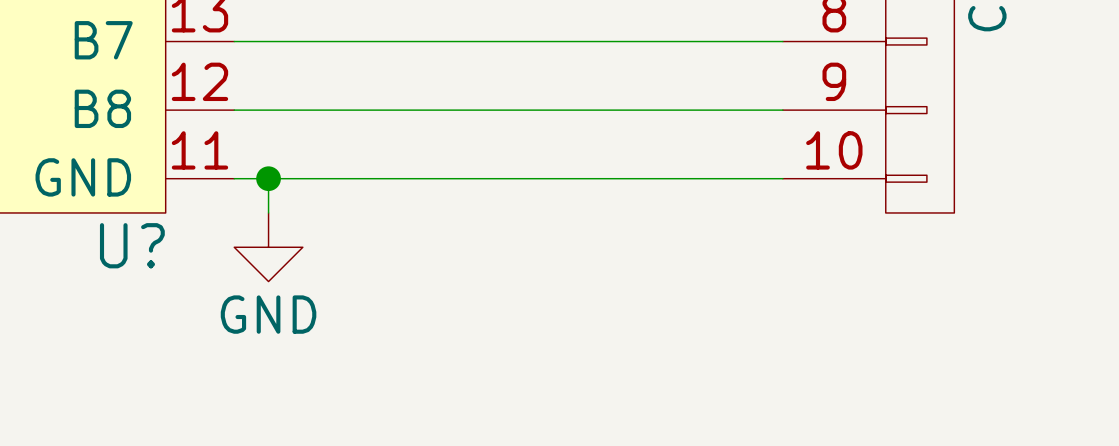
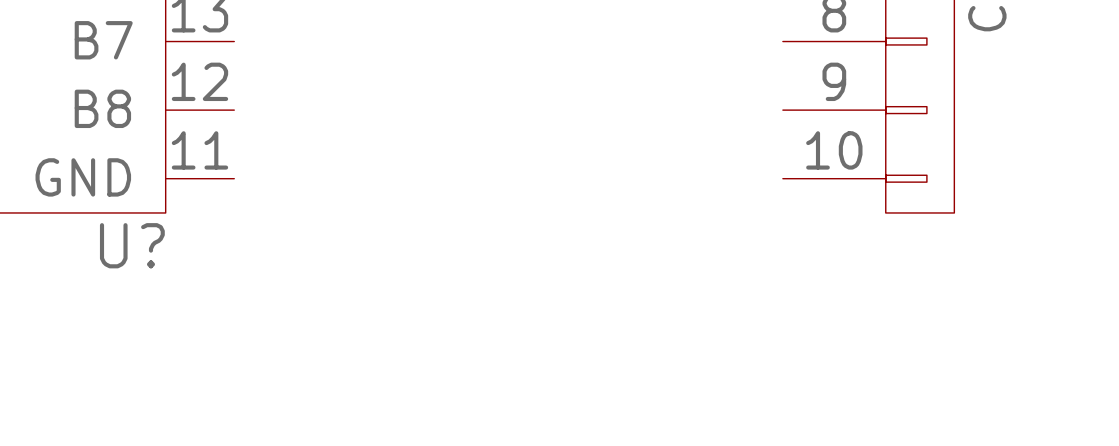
wire: (234, 41) (782, 41) -> none
wire: (234, 110) (782, 110) -> none
wire: (234, 178) (782, 178) -> none
wire: (268, 178) (268, 212) -> none
junction: (268, 178) -> none
power symbol: GND (268, 247) -> none

